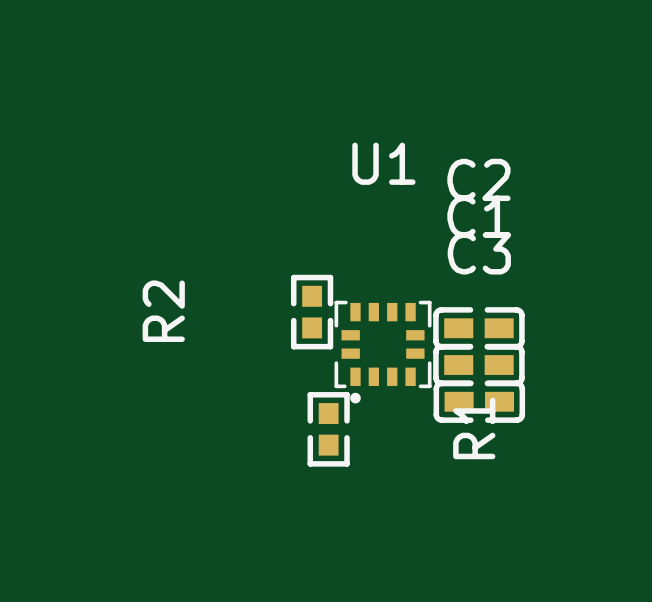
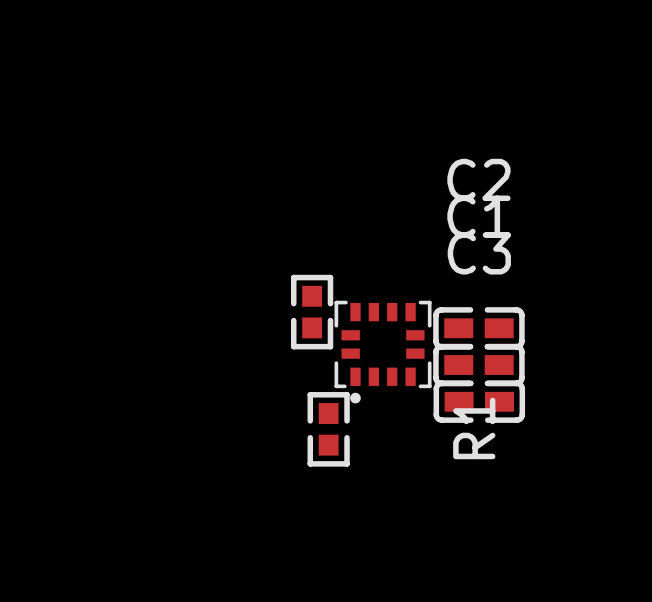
U1 name: U1 (383, 163) -> none
R2 name: R2 (163, 311) -> none

